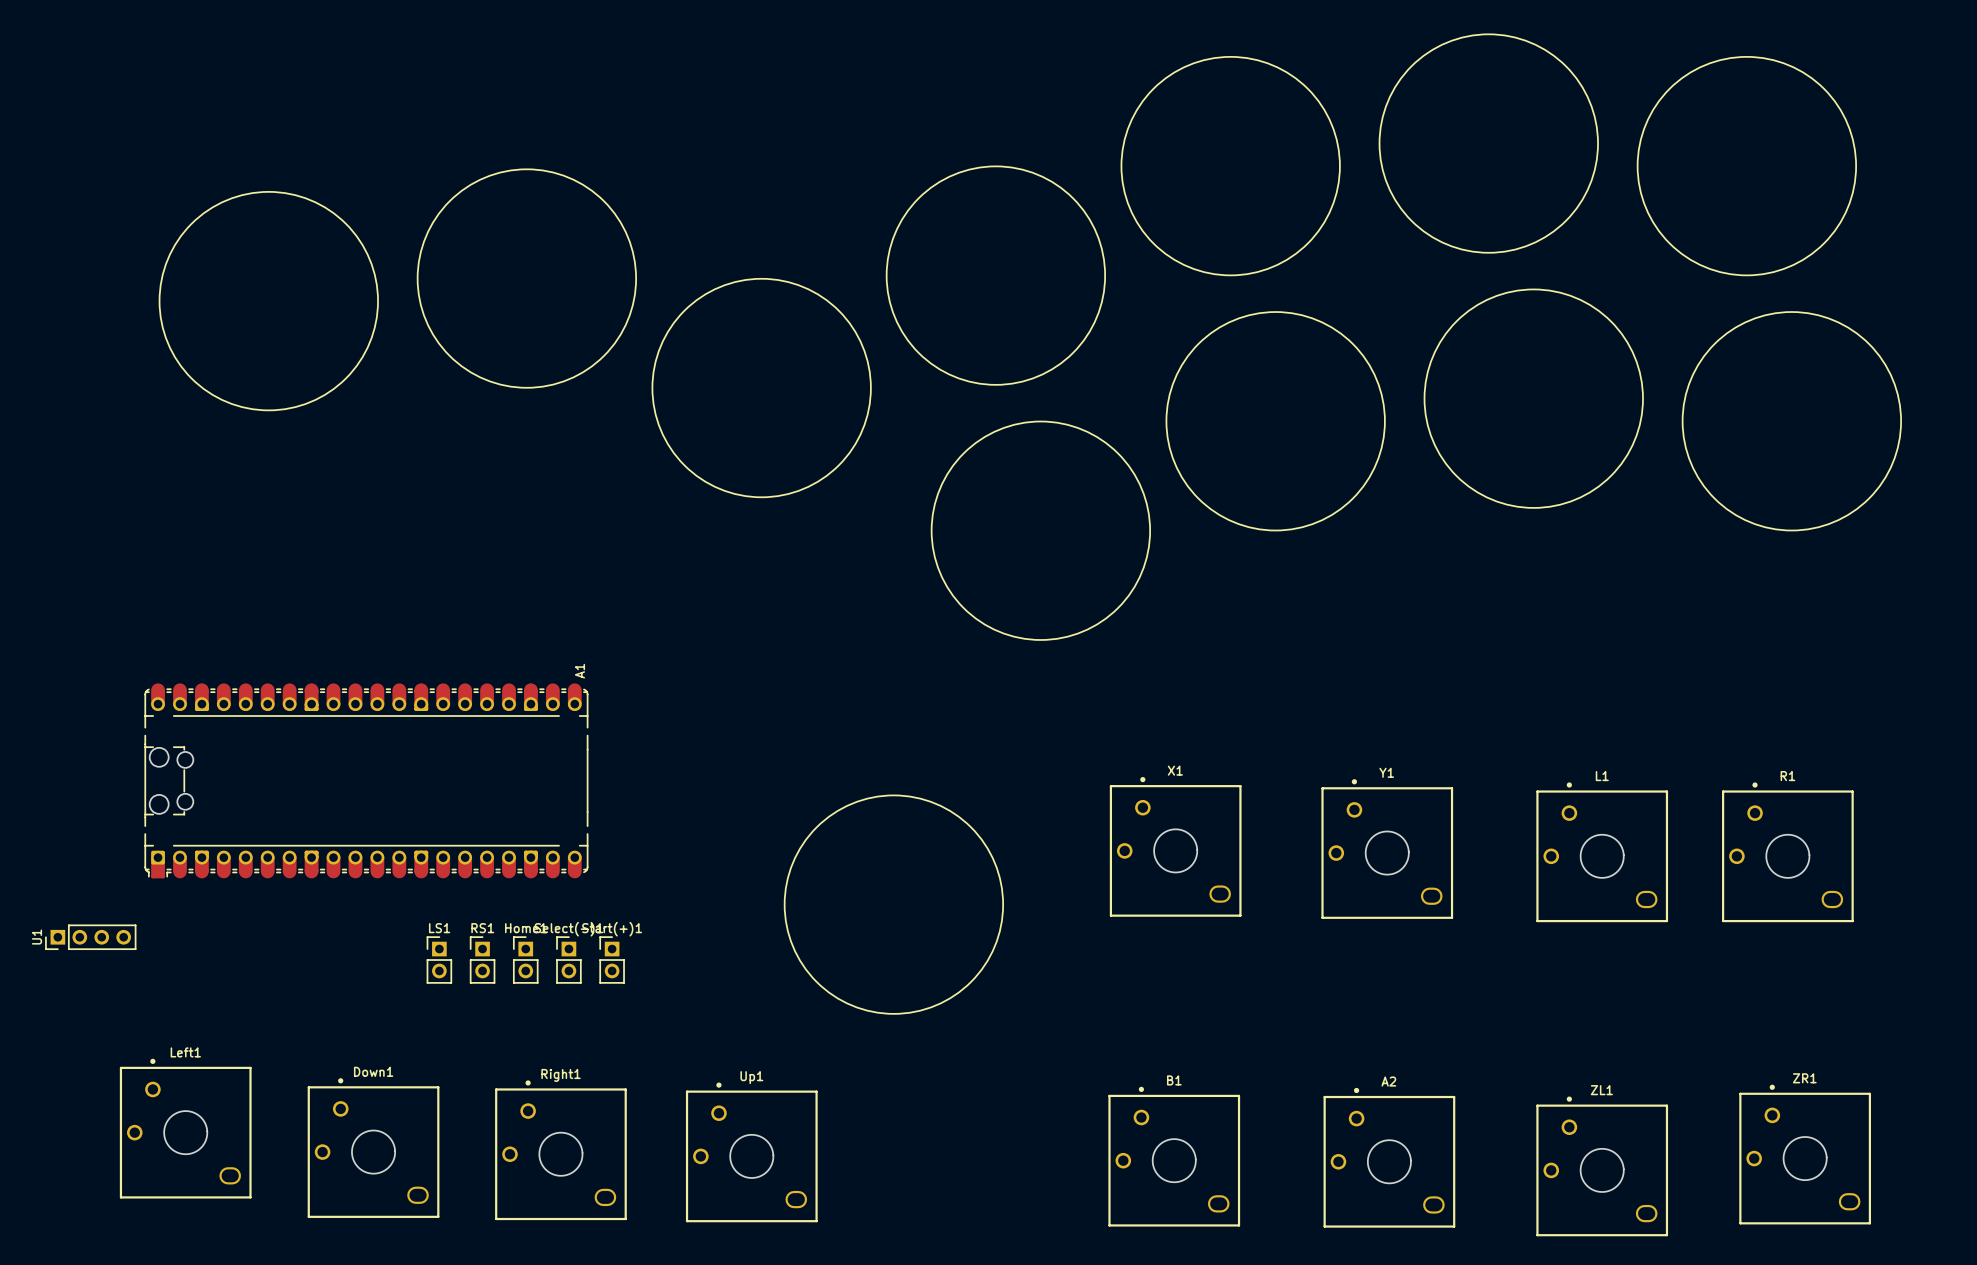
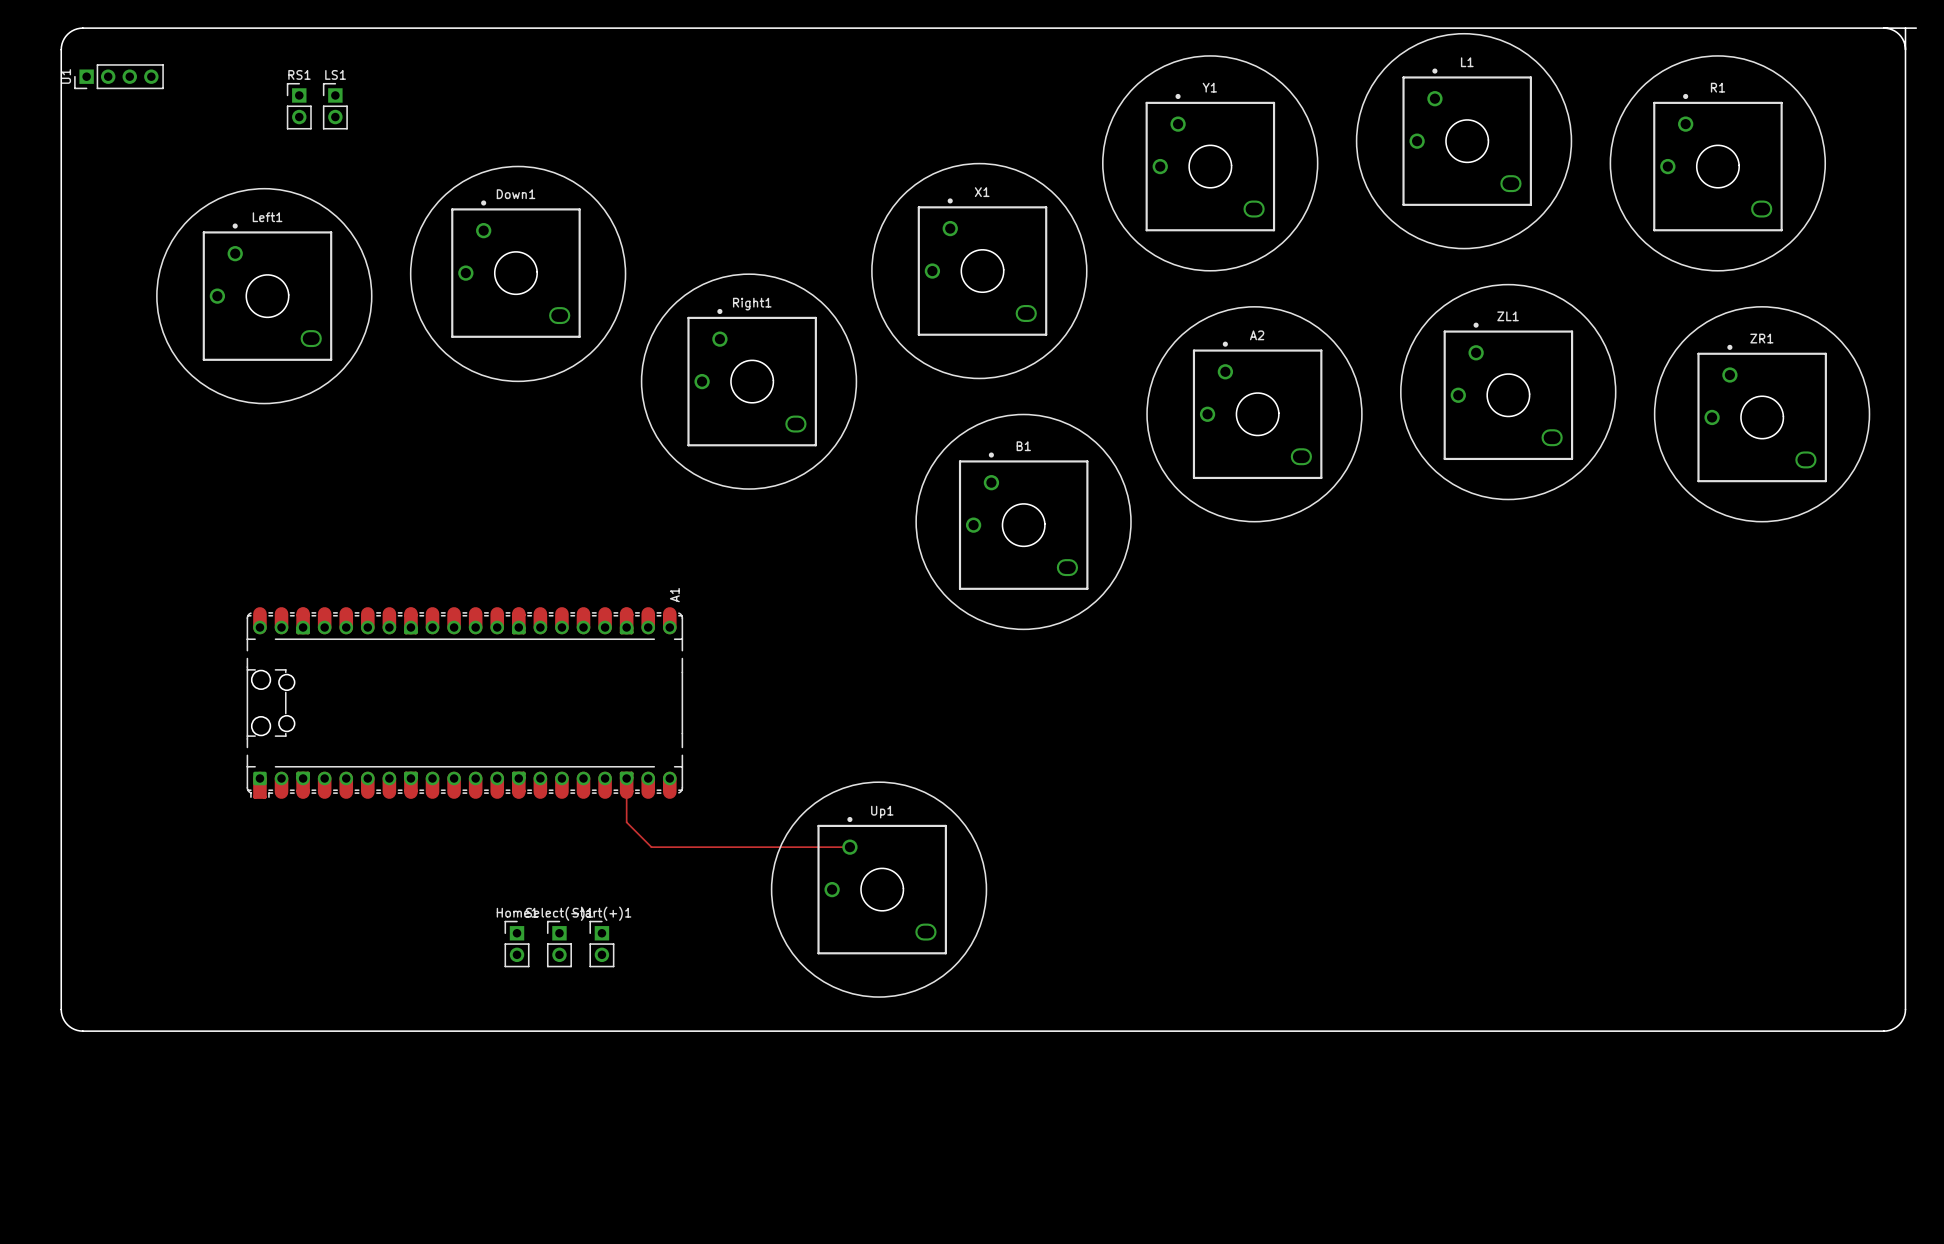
board edge: none -> (1883, 28) (1892, 29) (1899, 34) (1903, 41) (1905, 49)
board edge: none -> (1905, 28) (1905, 1009) (1902, 1020) (1894, 1028) (1883, 1031) (82, 1031) (72, 1028) (64, 1020) (61, 1009) (61, 49) (64, 38) (72, 31) (82, 28) (1916, 28)
A1 position: (366, 780) -> (464, 702)
track: none -> (626, 785) (626, 822) (651, 847) (849, 847)
X1 position: (1175, 846) -> (982, 267)
Y1 position: (1387, 849) -> (1210, 162)
L1 position: (1602, 852) -> (1467, 137)
R1 position: (1787, 852) -> (1717, 162)
U1 position: (90, 937) -> (118, 76)
LS1 position: (439, 960) -> (335, 106)
RS1 position: (482, 960) -> (299, 106)
Left1 position: (185, 1128) -> (267, 292)
Down1 position: (373, 1148) -> (515, 269)
Right1 position: (560, 1150) -> (752, 377)
Up1 position: (751, 1152) -> (882, 885)
ZR1 position: (1805, 1154) -> (1762, 413)
B1 position: (1174, 1156) -> (1023, 521)
A2 position: (1389, 1157) -> (1257, 410)
ZL1 position: (1602, 1166) -> (1508, 391)

